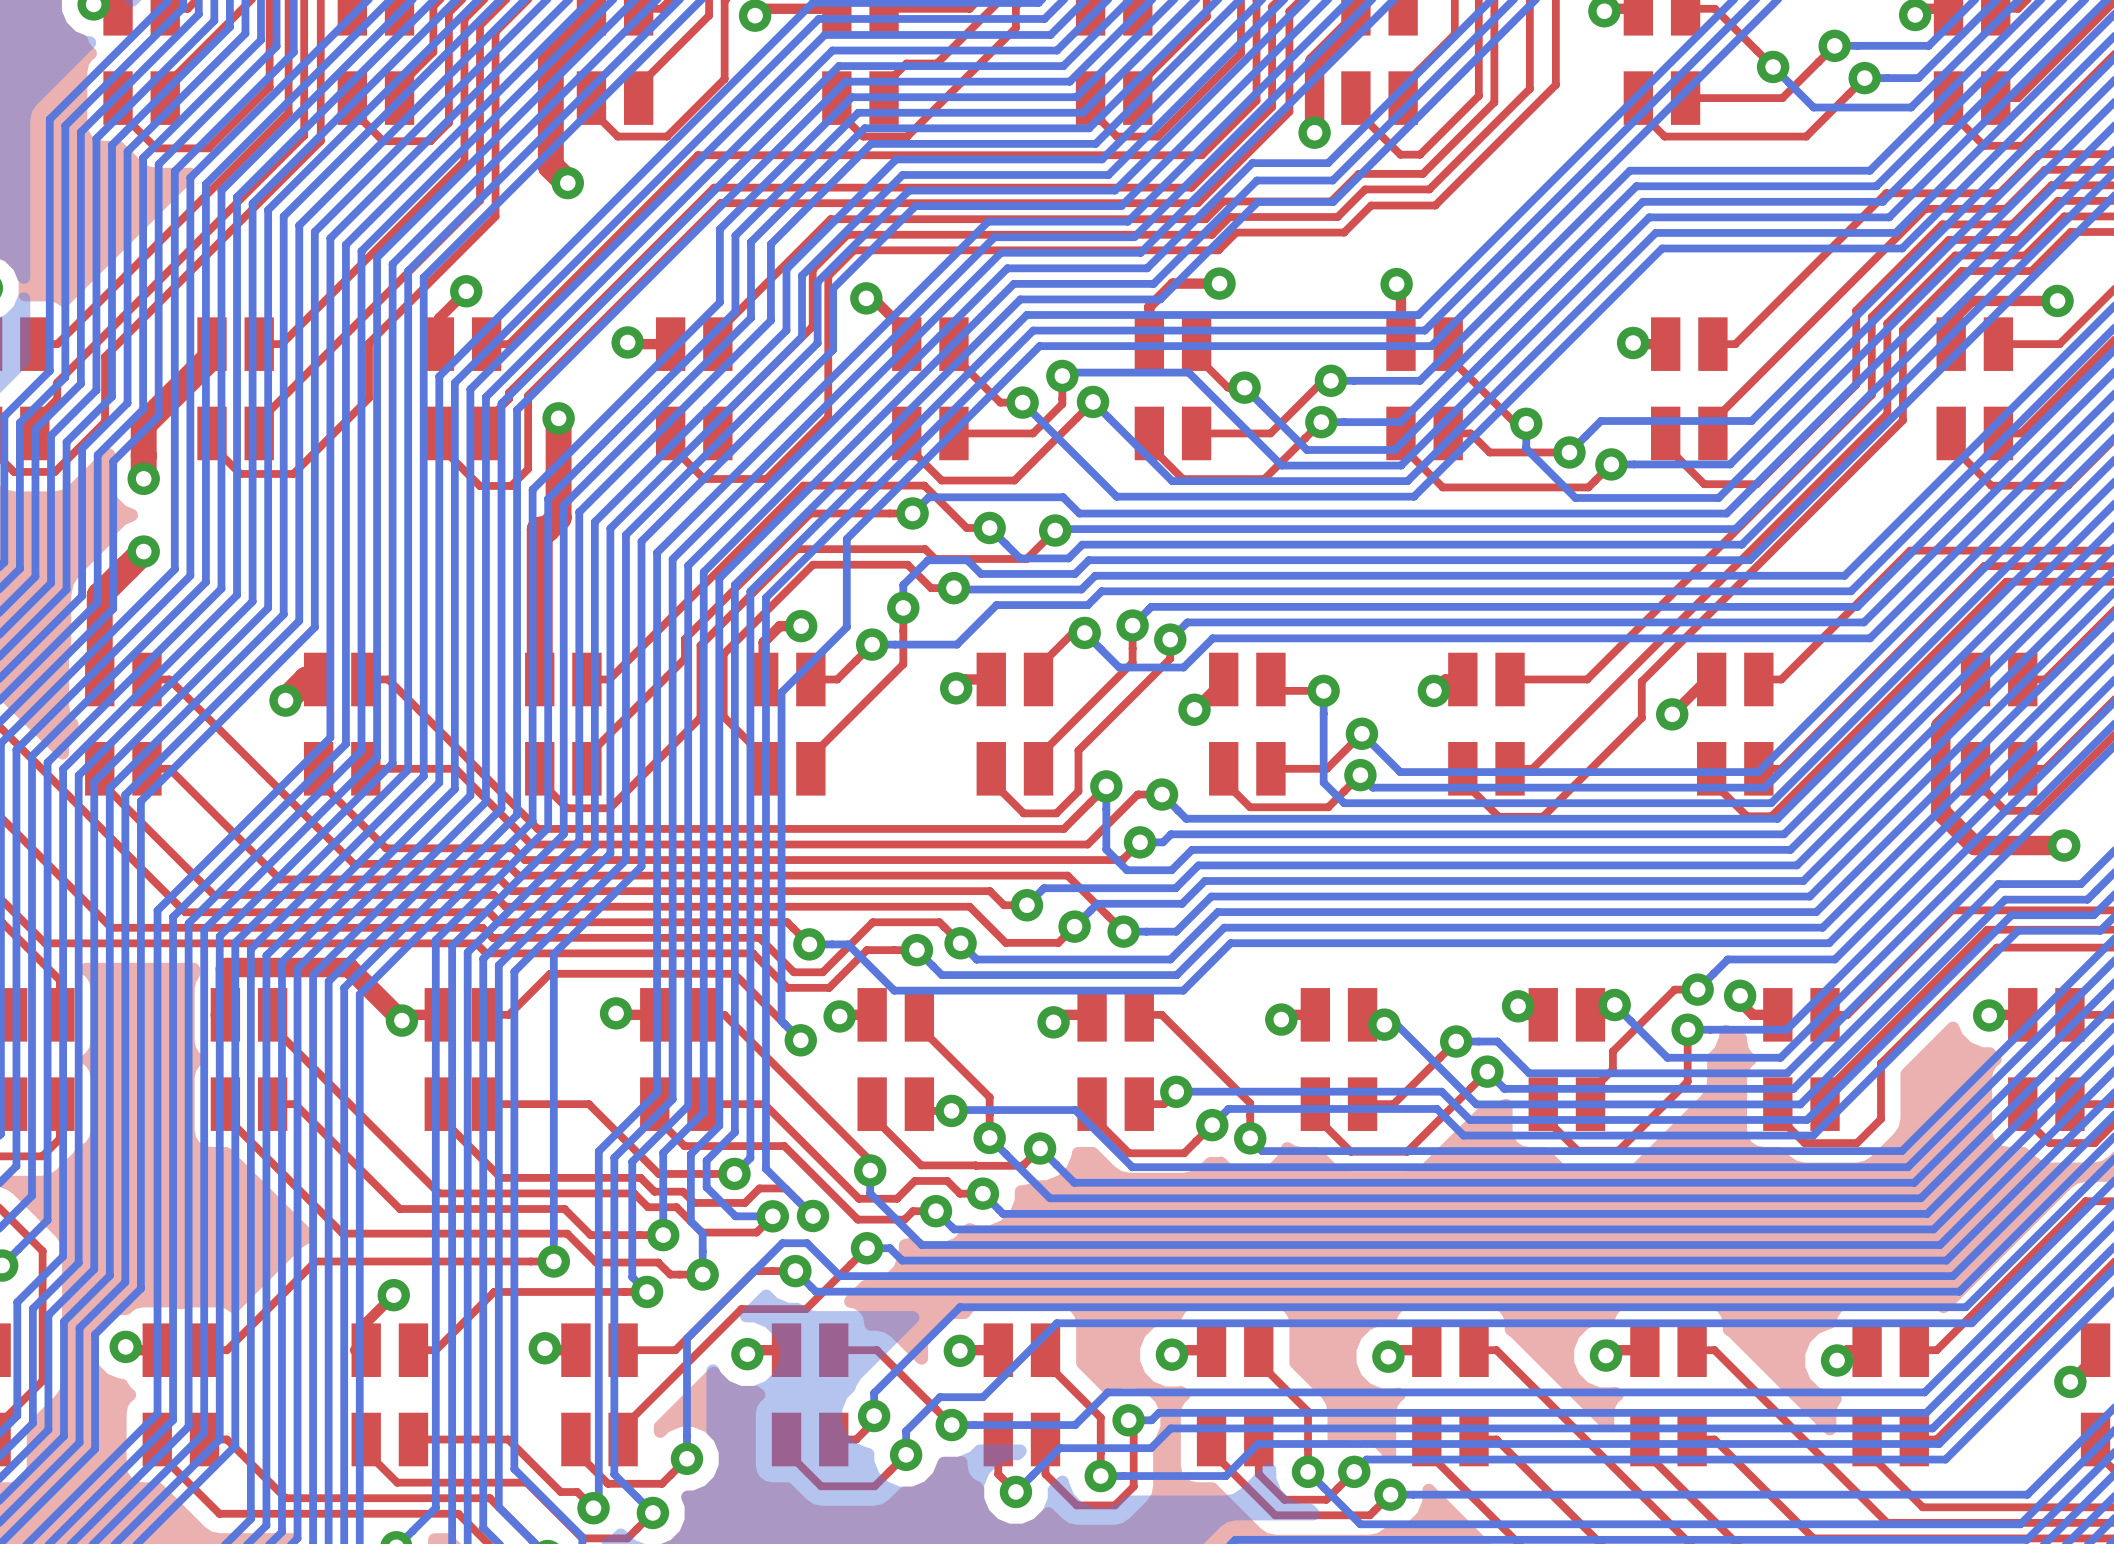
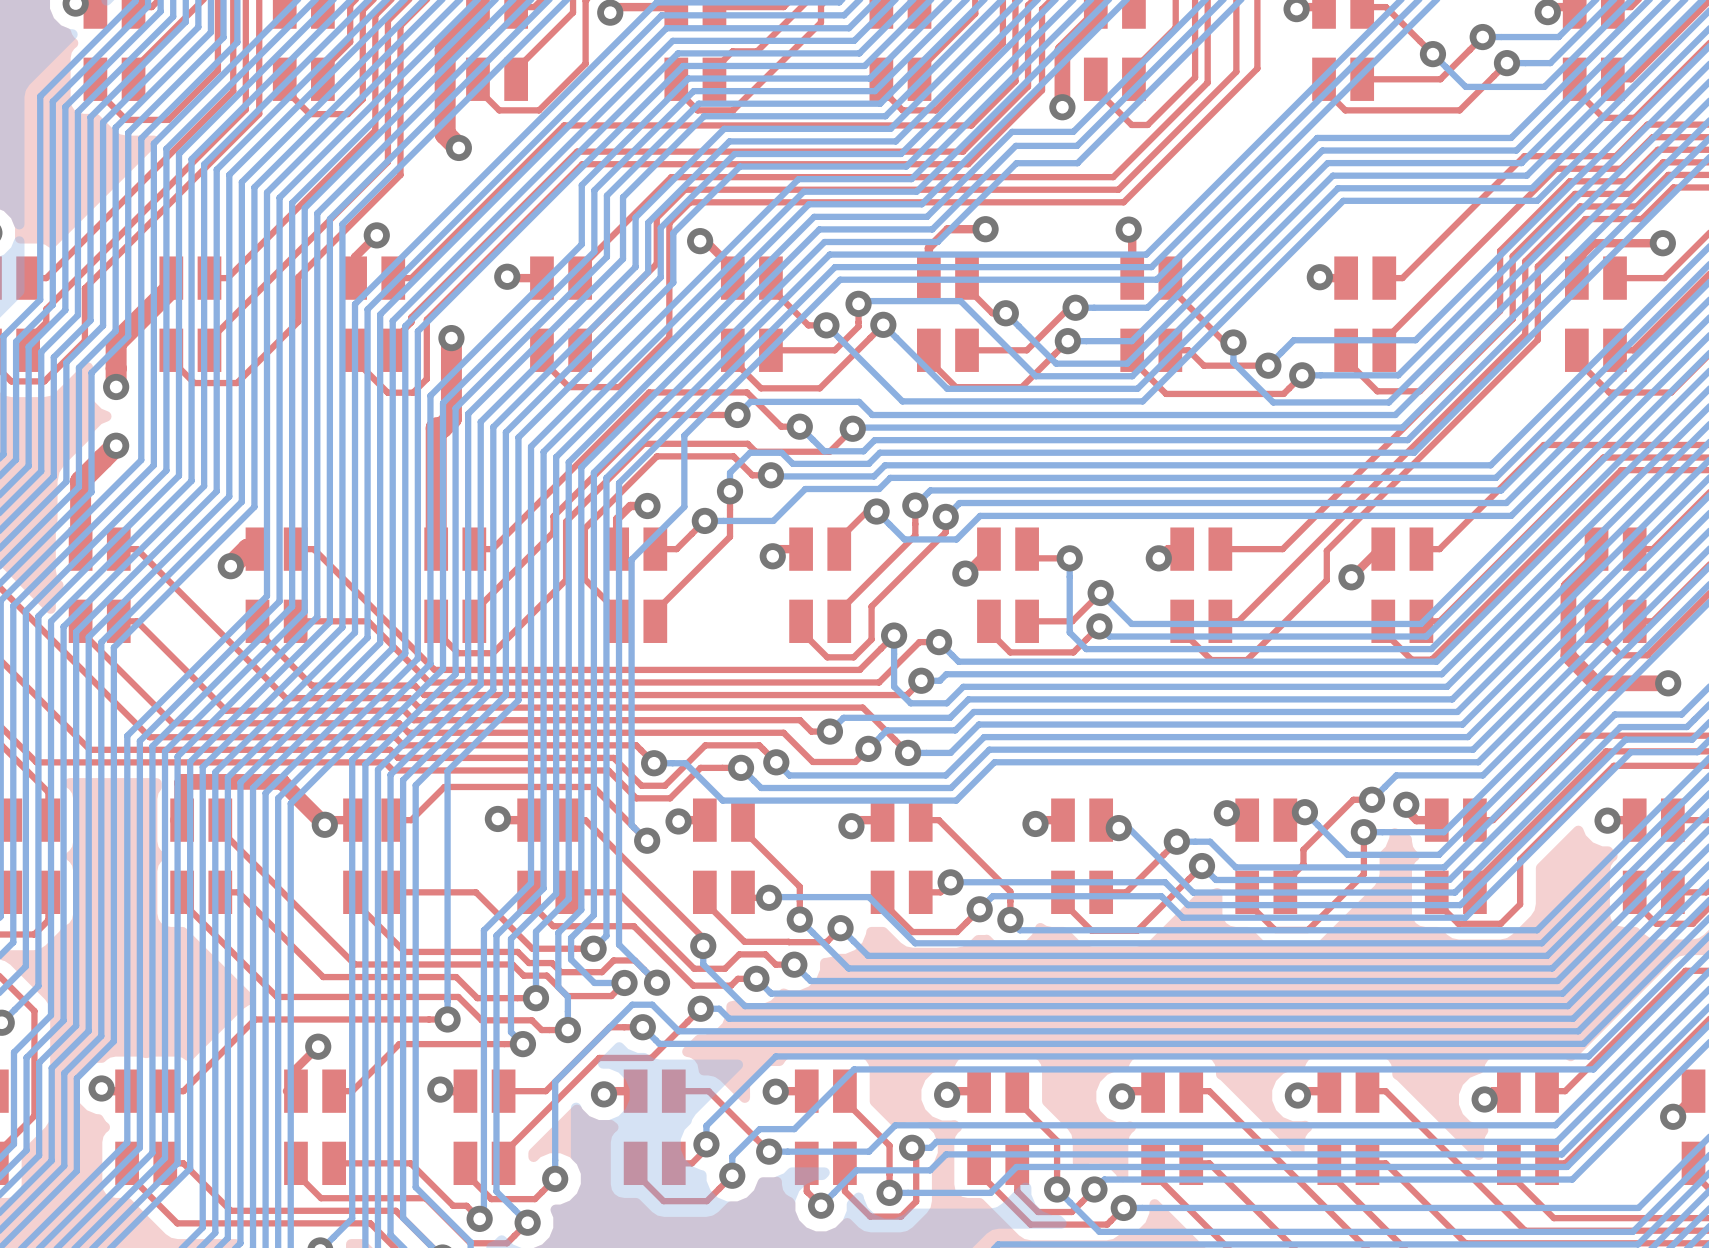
top track: (1422, 173) (1358, 173) (1331, 201) (1223, 201) (1205, 219) -> (1149, 140) (1113, 177) (974, 177)
top track: (1429, 189) (1365, 189) (1337, 217) (1229, 217) (1212, 234) -> (1155, 153) (1118, 189) (979, 189)
top track: (1435, 205) (1371, 205) (1344, 232) (1236, 232) (1218, 250) -> (1159, 166) (1123, 202) (984, 202)

